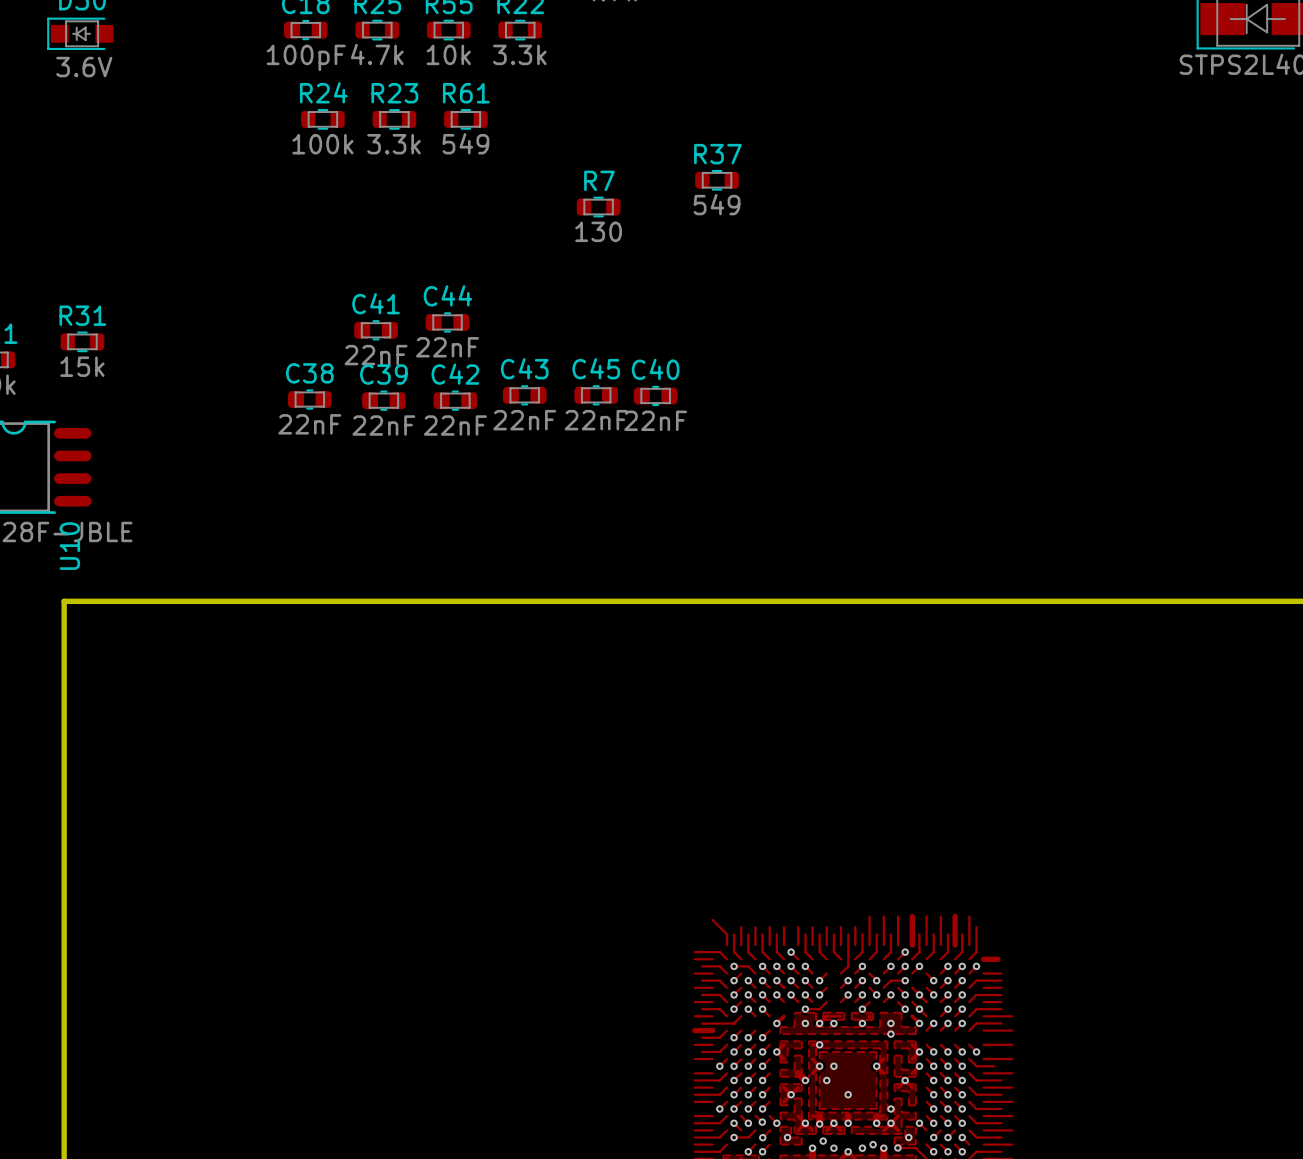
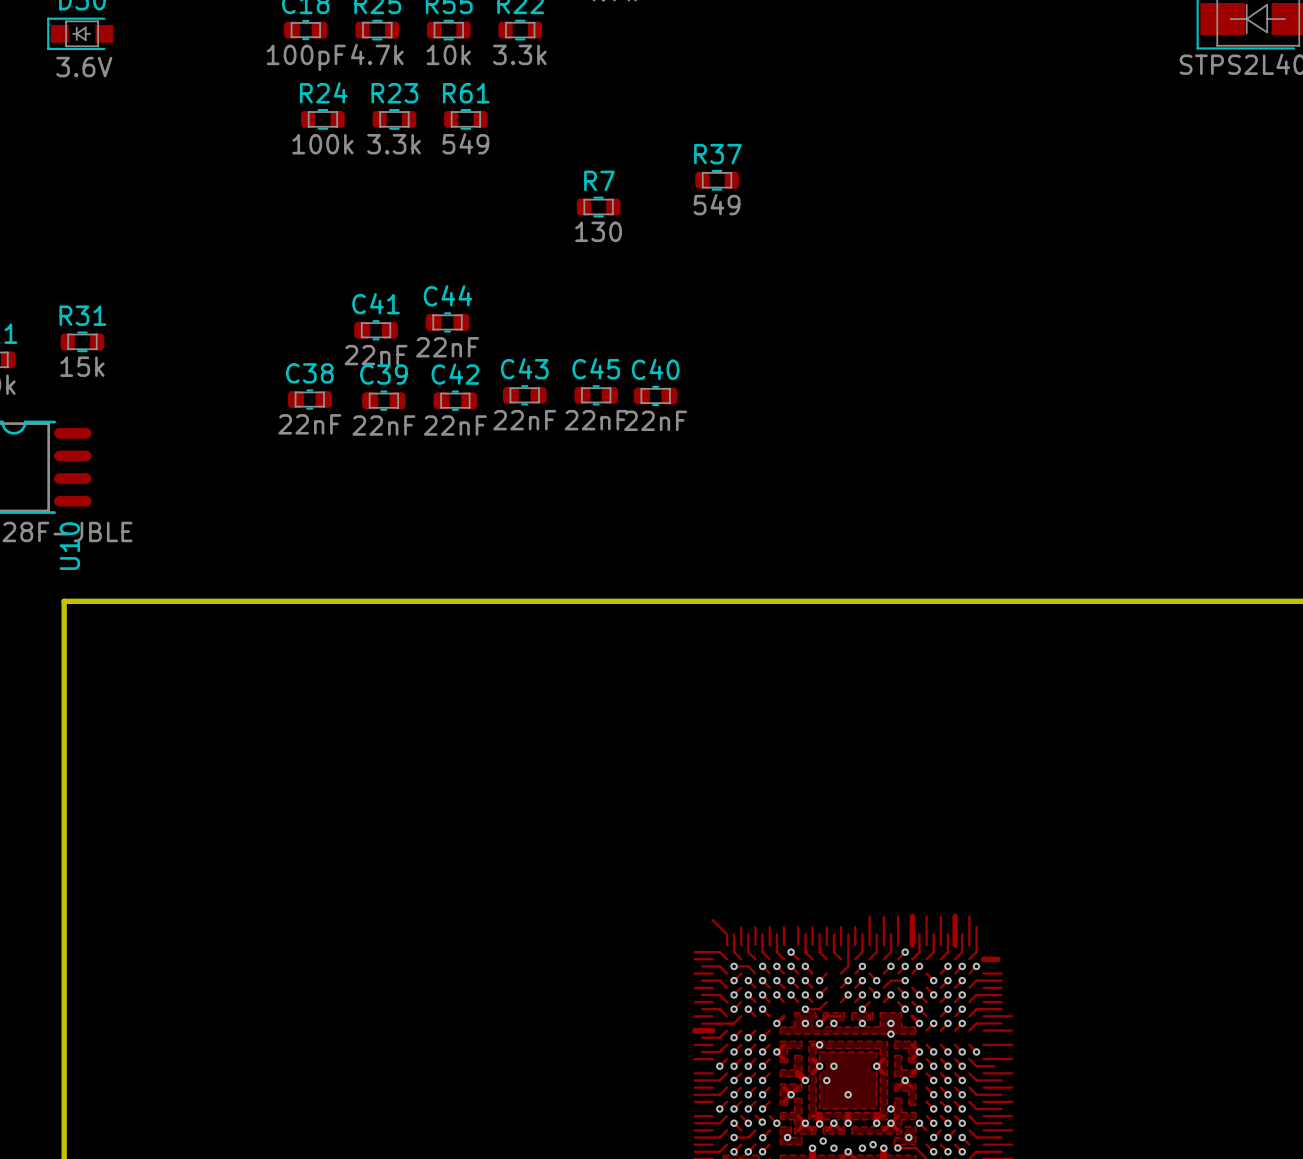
track: none -> (741, 1144) (734, 1151)
via: none -> (734, 1151)

